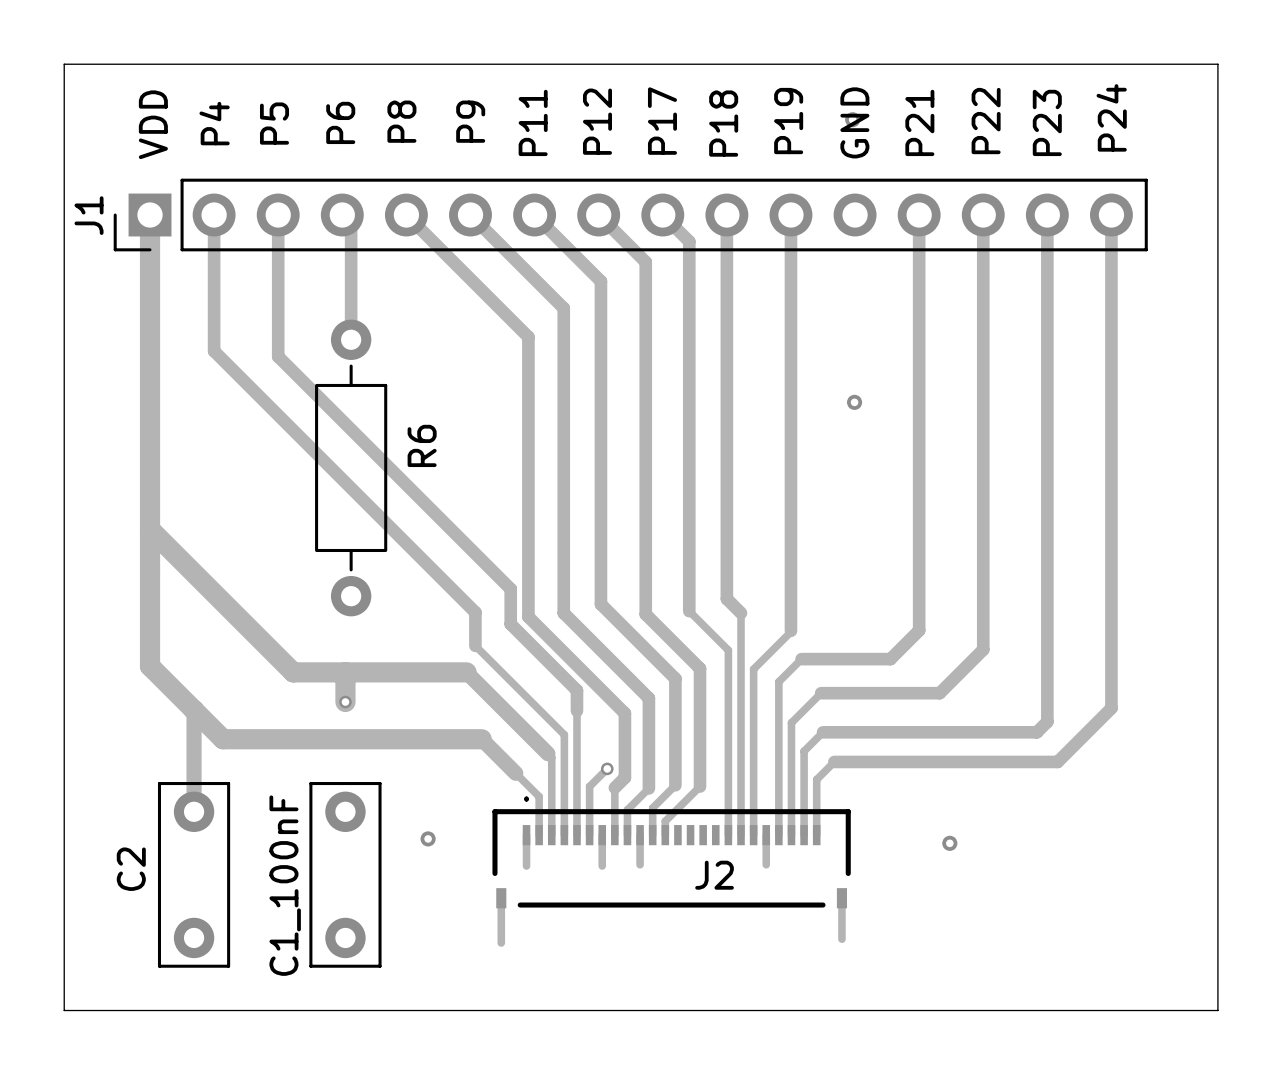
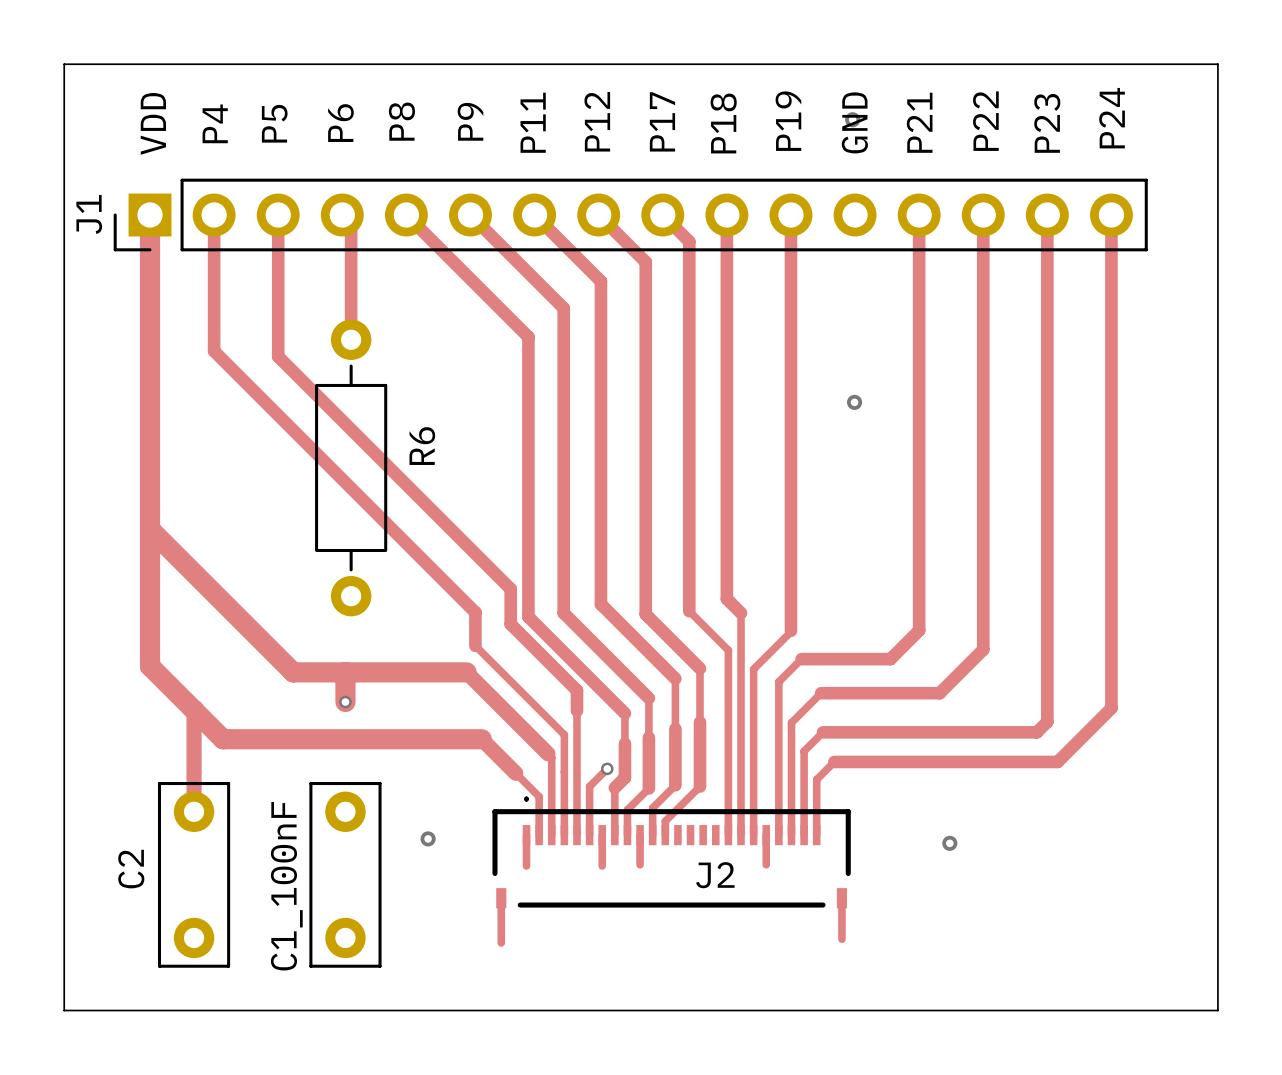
track width: thick (700, 668) (700, 722) -> thin (700, 668) (700, 722)
track width: thick (675, 678) (675, 728) -> thin (675, 678) (675, 728)
track width: thick (648, 698) (648, 737) -> thin (648, 698) (648, 737)
track width: thick (624, 713) (624, 743) -> thin (624, 713) (624, 743)

